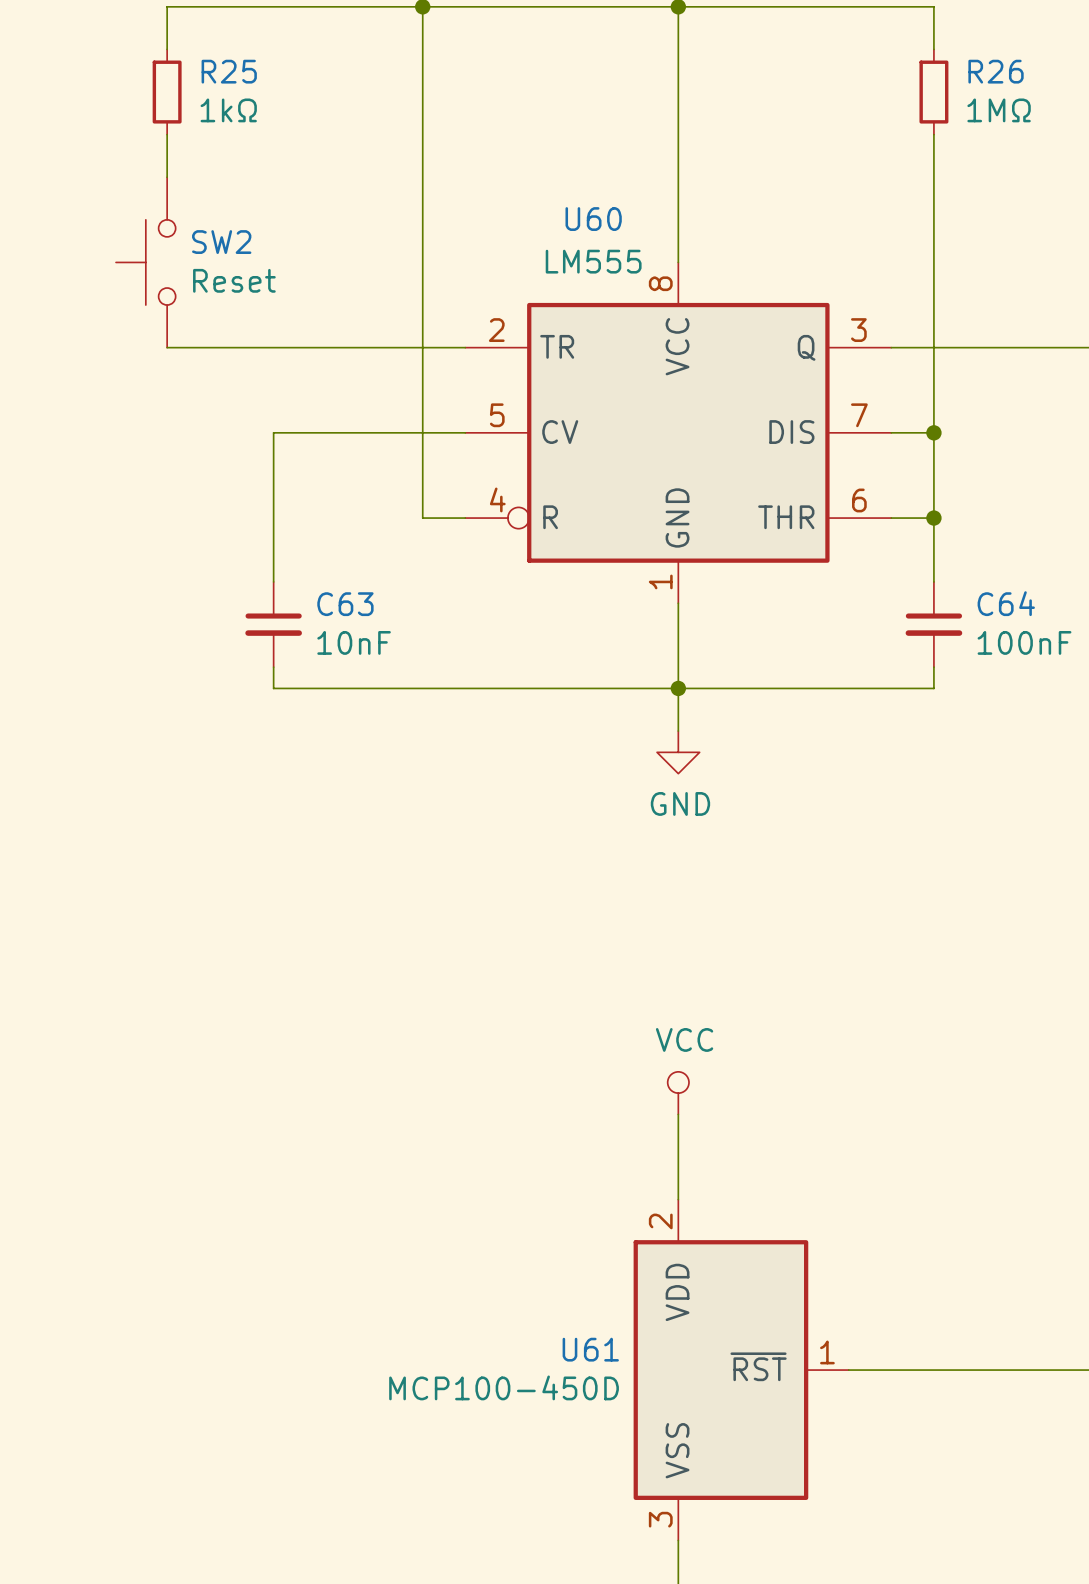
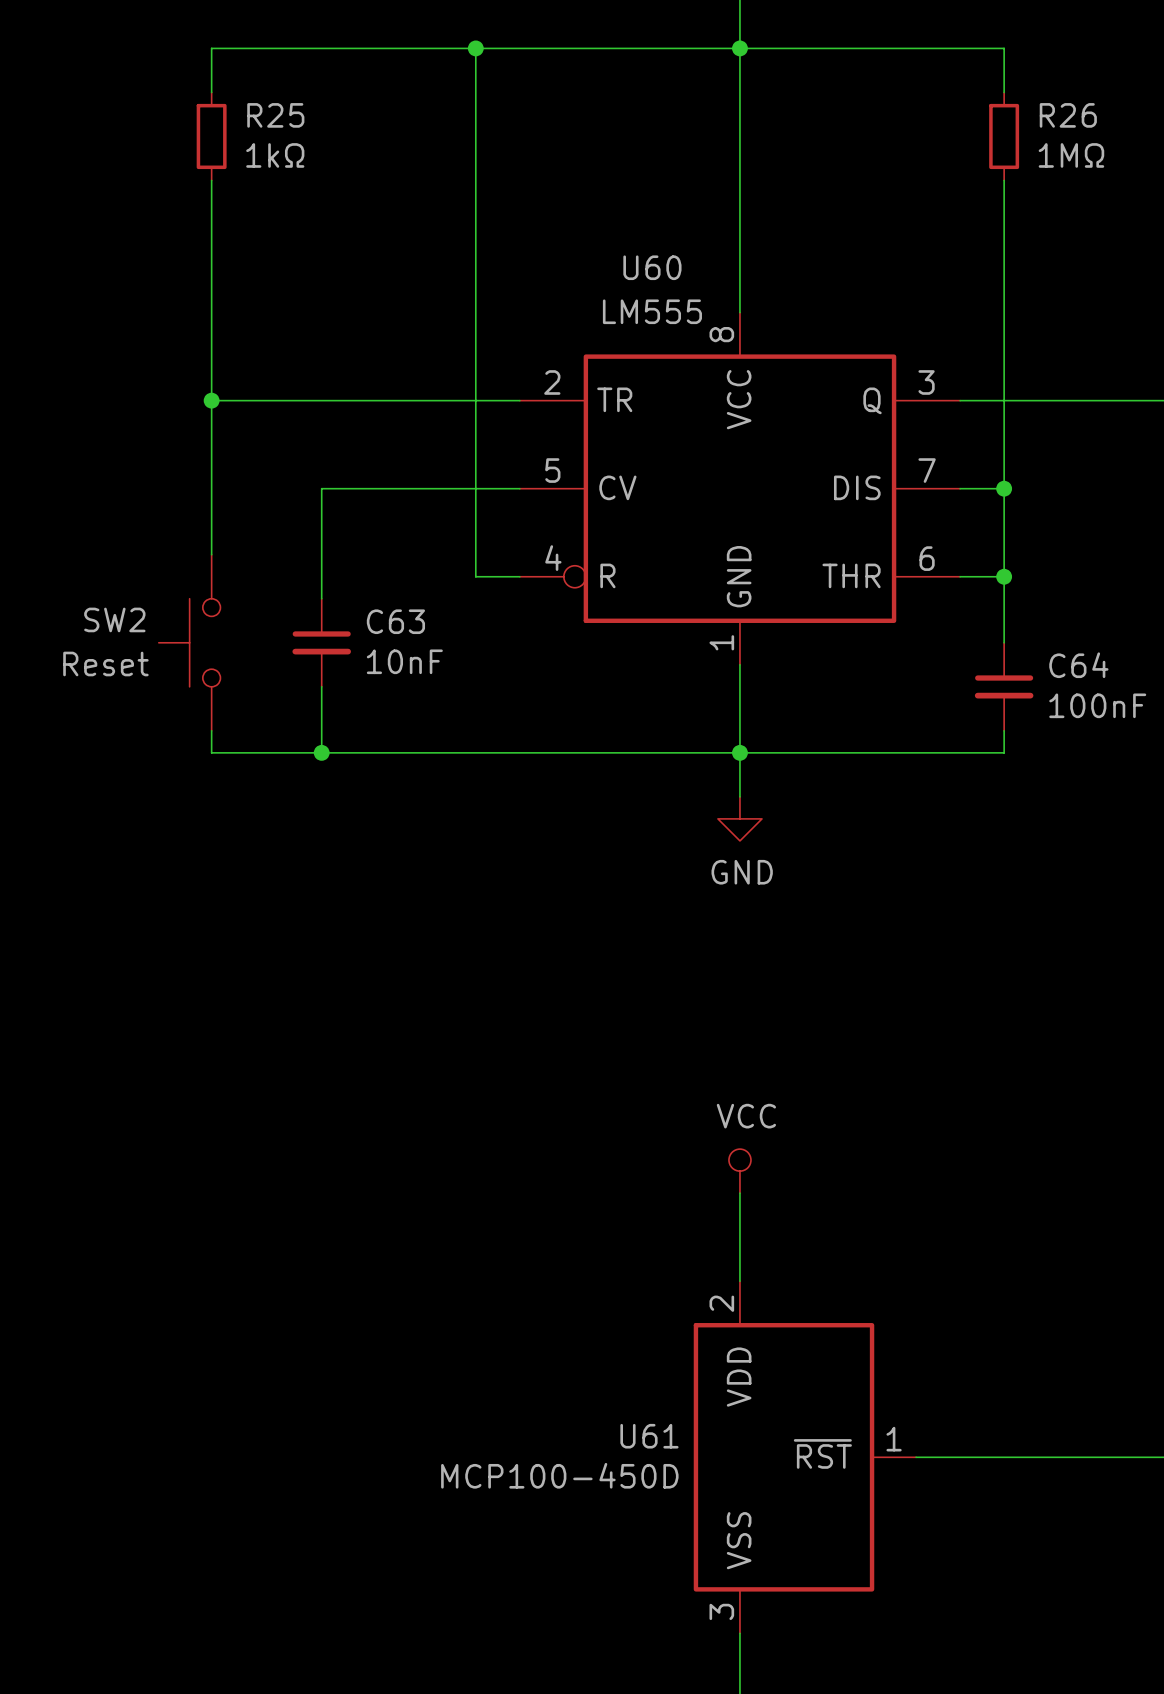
wire: none -> (211, 224) (211, 554)
SW2 name position: SW2 (221, 242) -> SW2 (114, 619)
SW2 position: (145, 262) -> (189, 642)
SW2 value position: Reset (234, 280) -> Reset (105, 663)
junction: none -> (211, 400)
C63 position: (273, 624) -> (321, 642)
wire: none -> (211, 730) (211, 752) (321, 752)
junction: none -> (321, 752)

